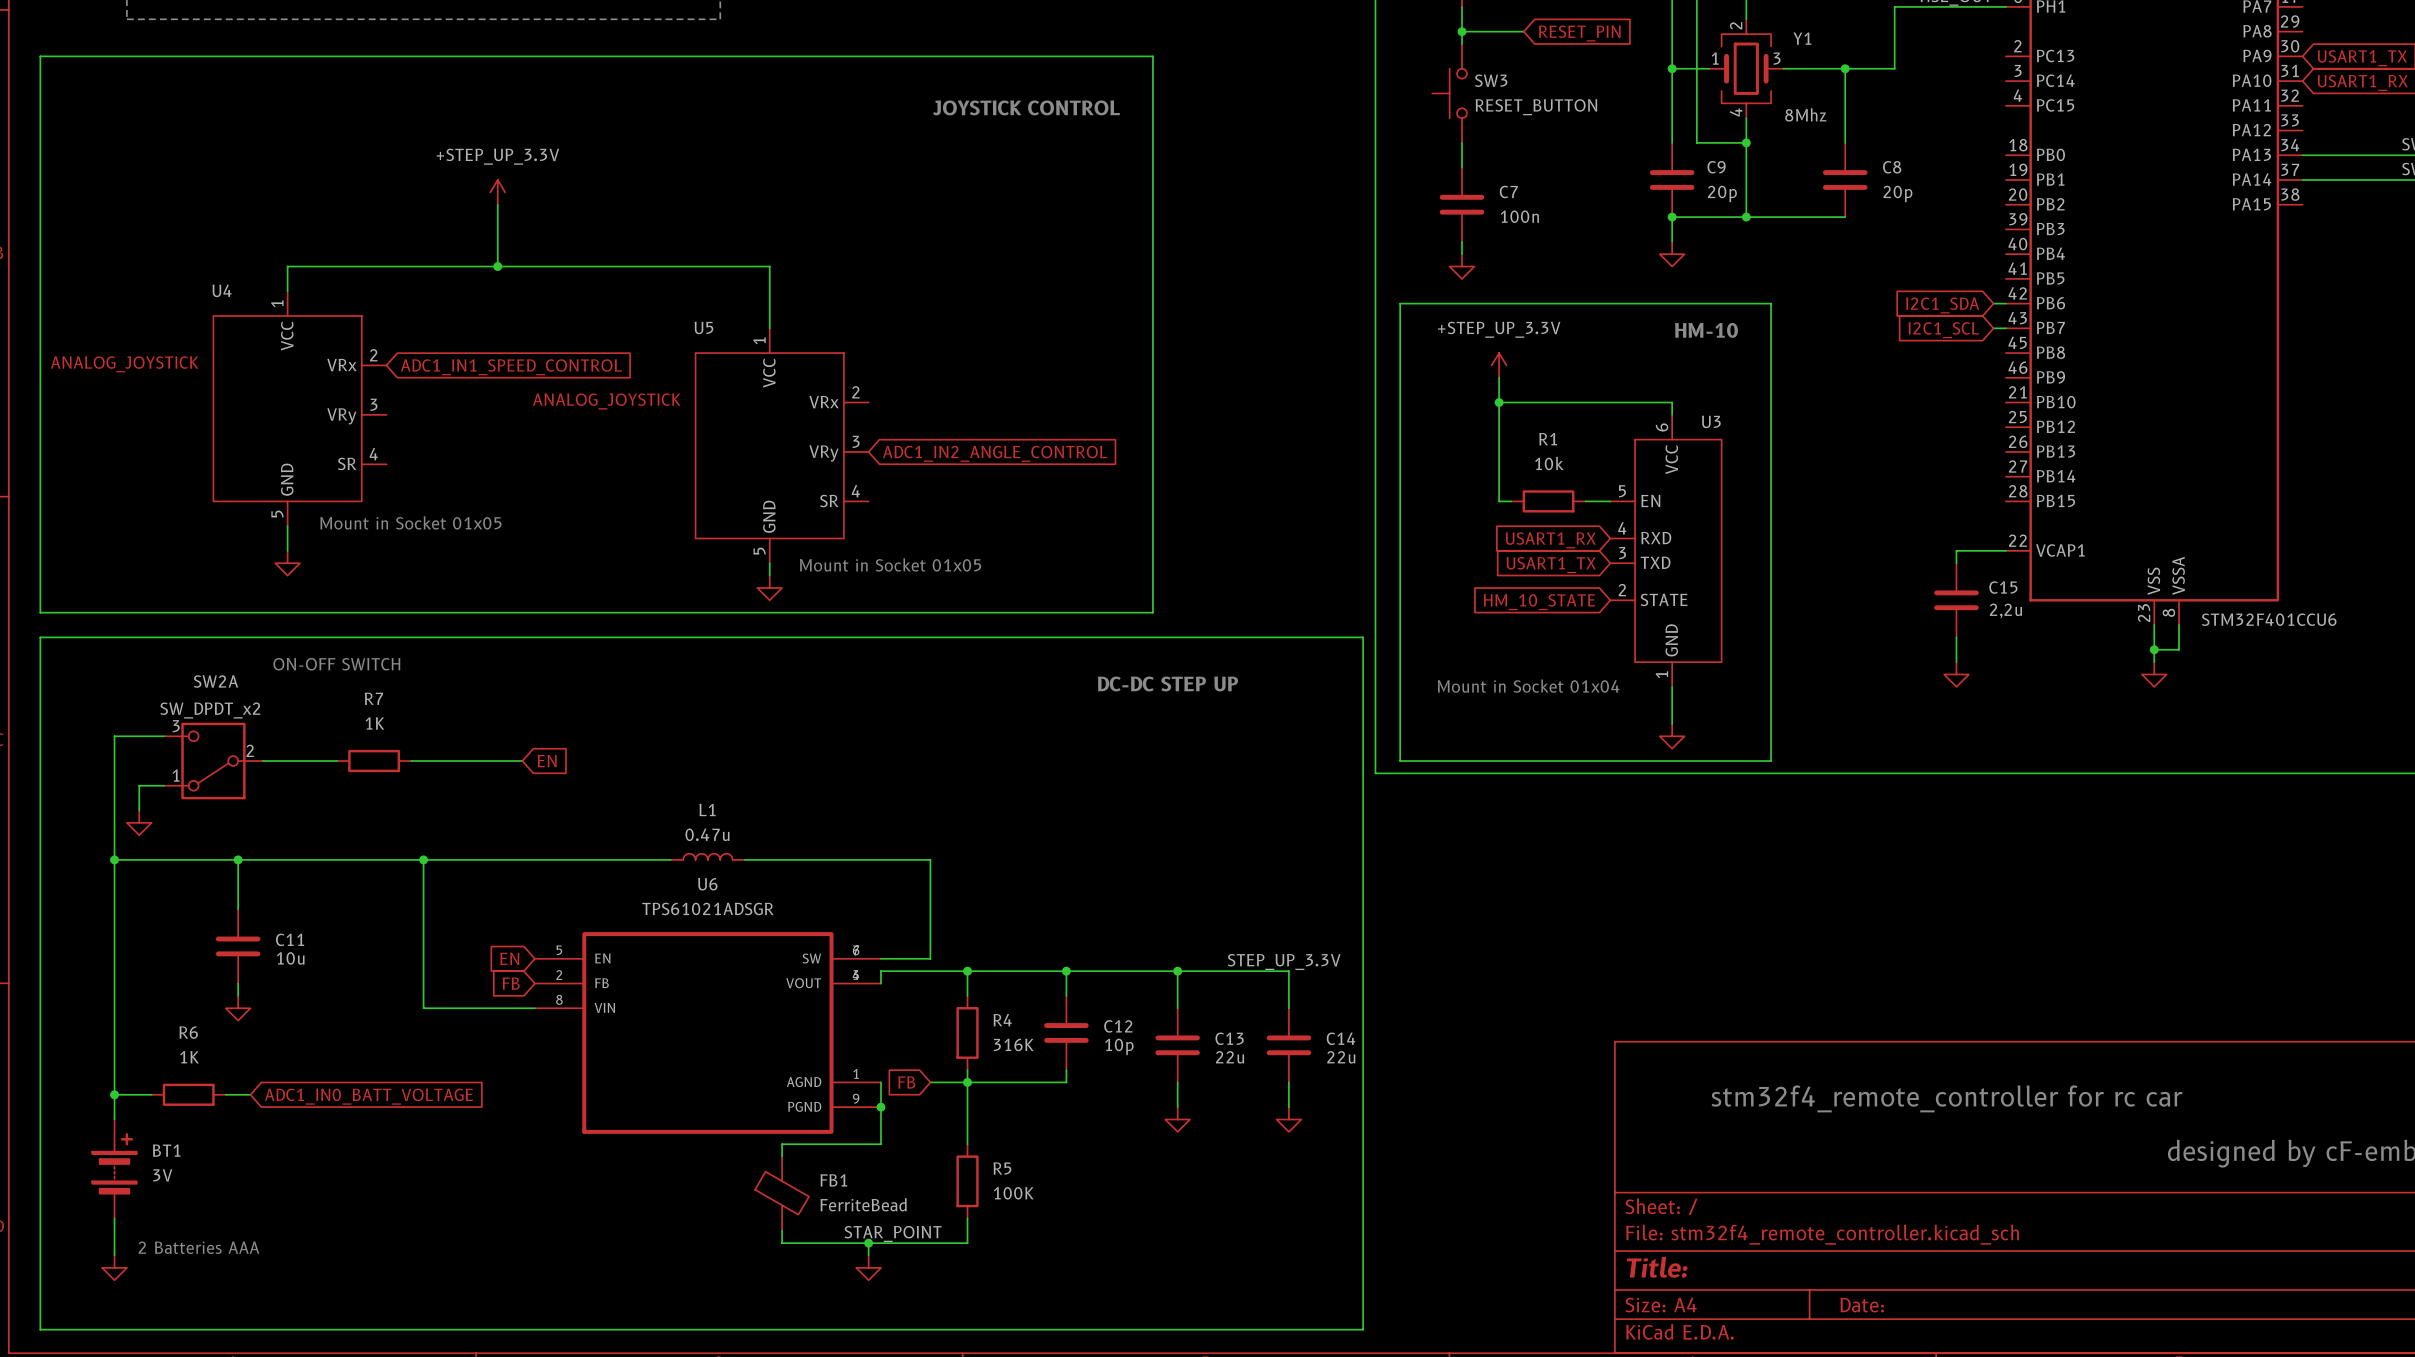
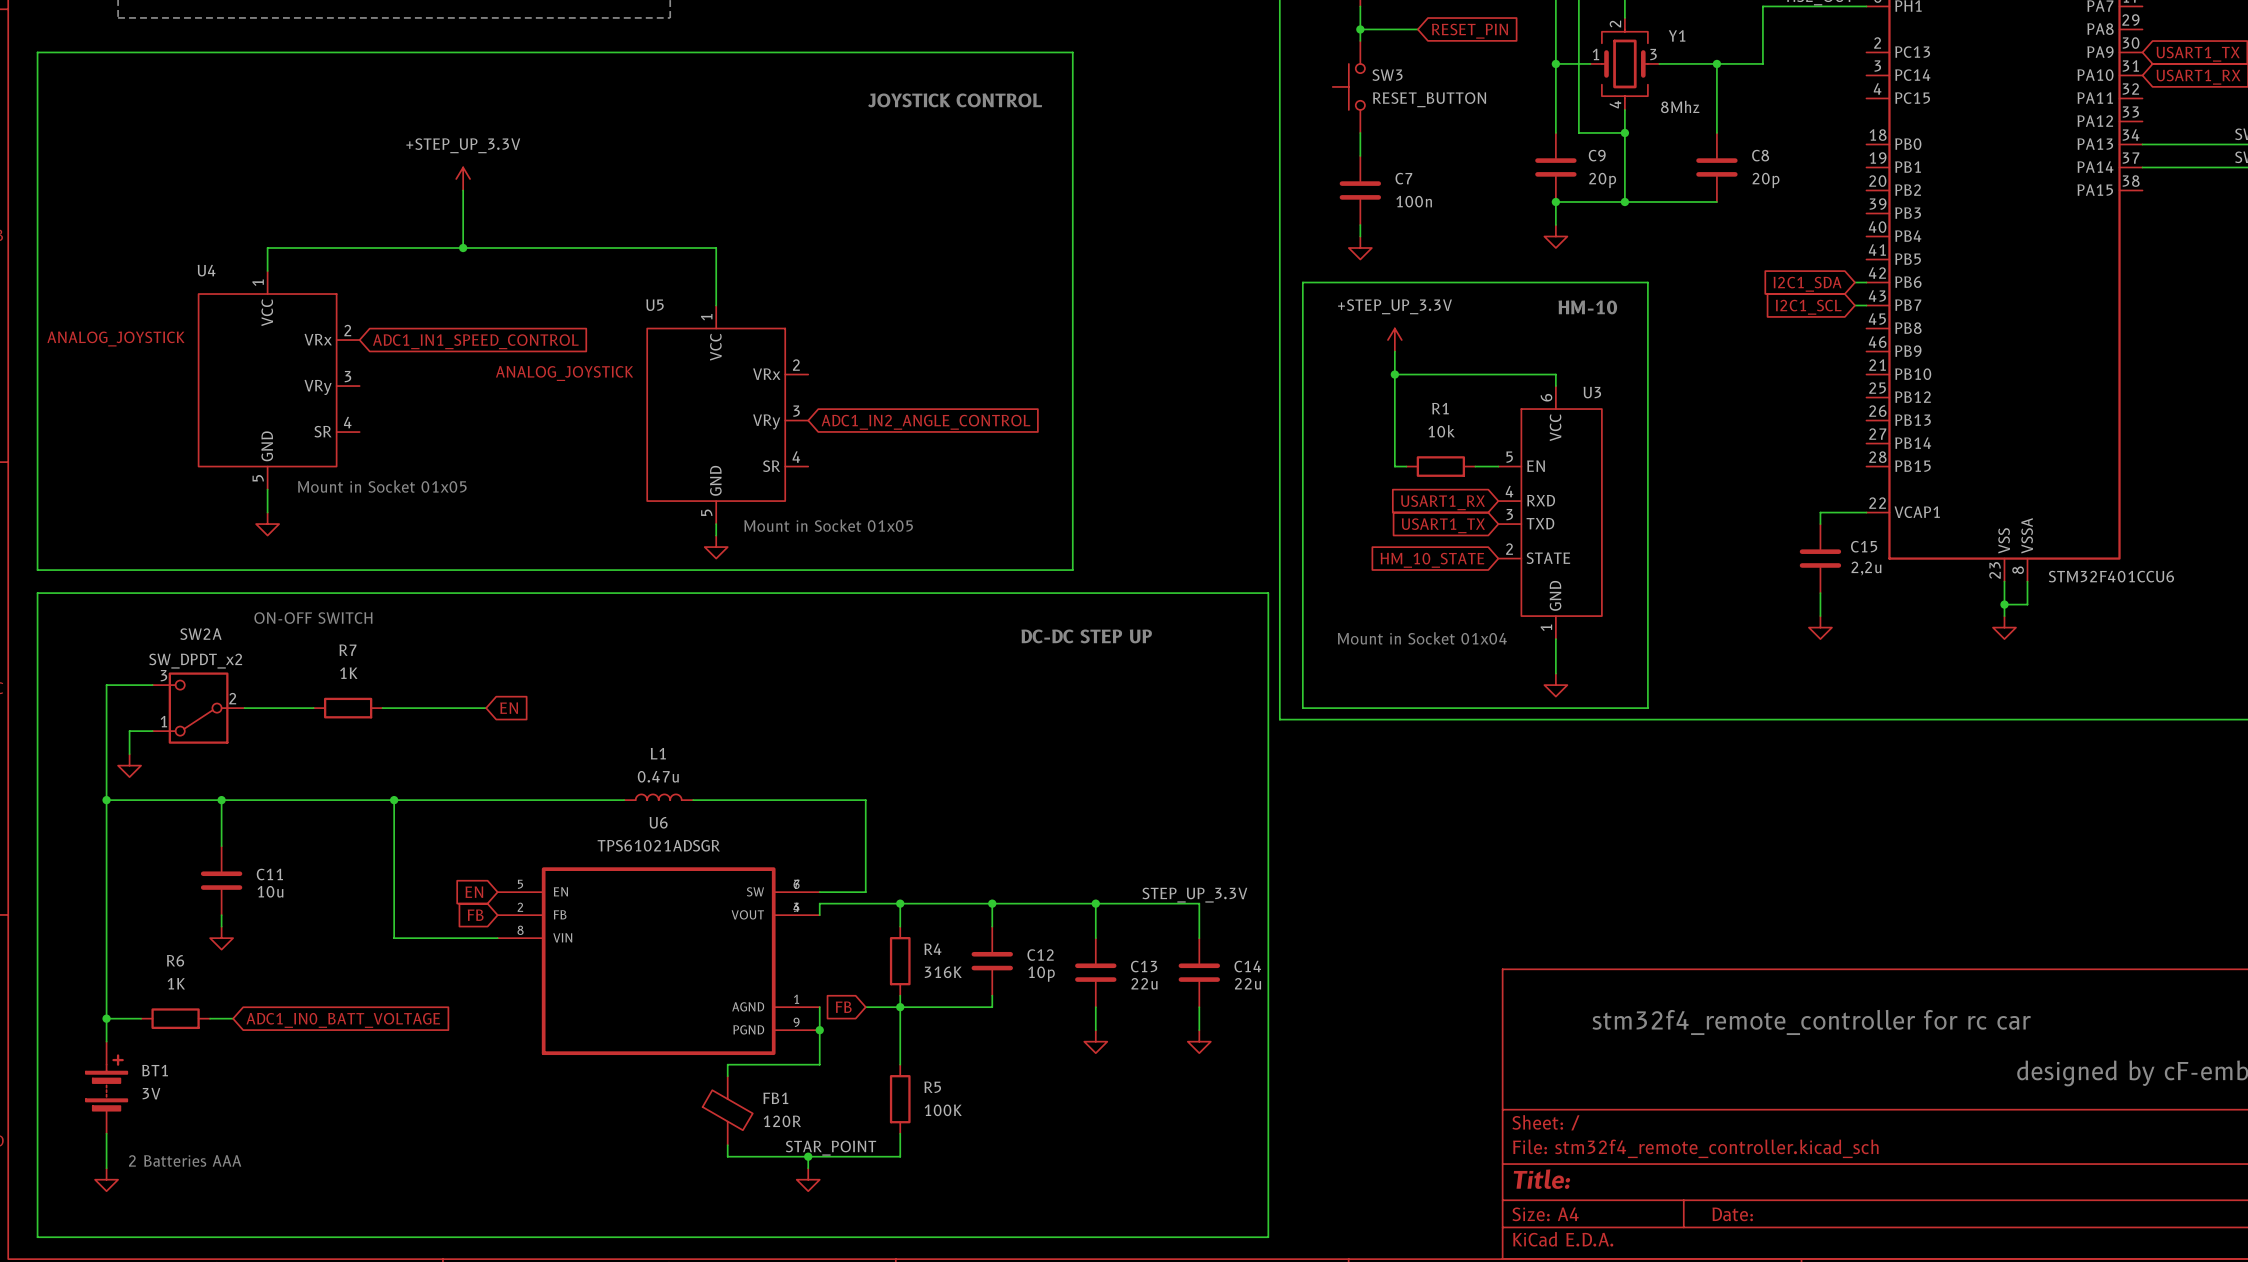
FB1 value: FerriteBead (863, 1204) -> 120R (782, 1121)

